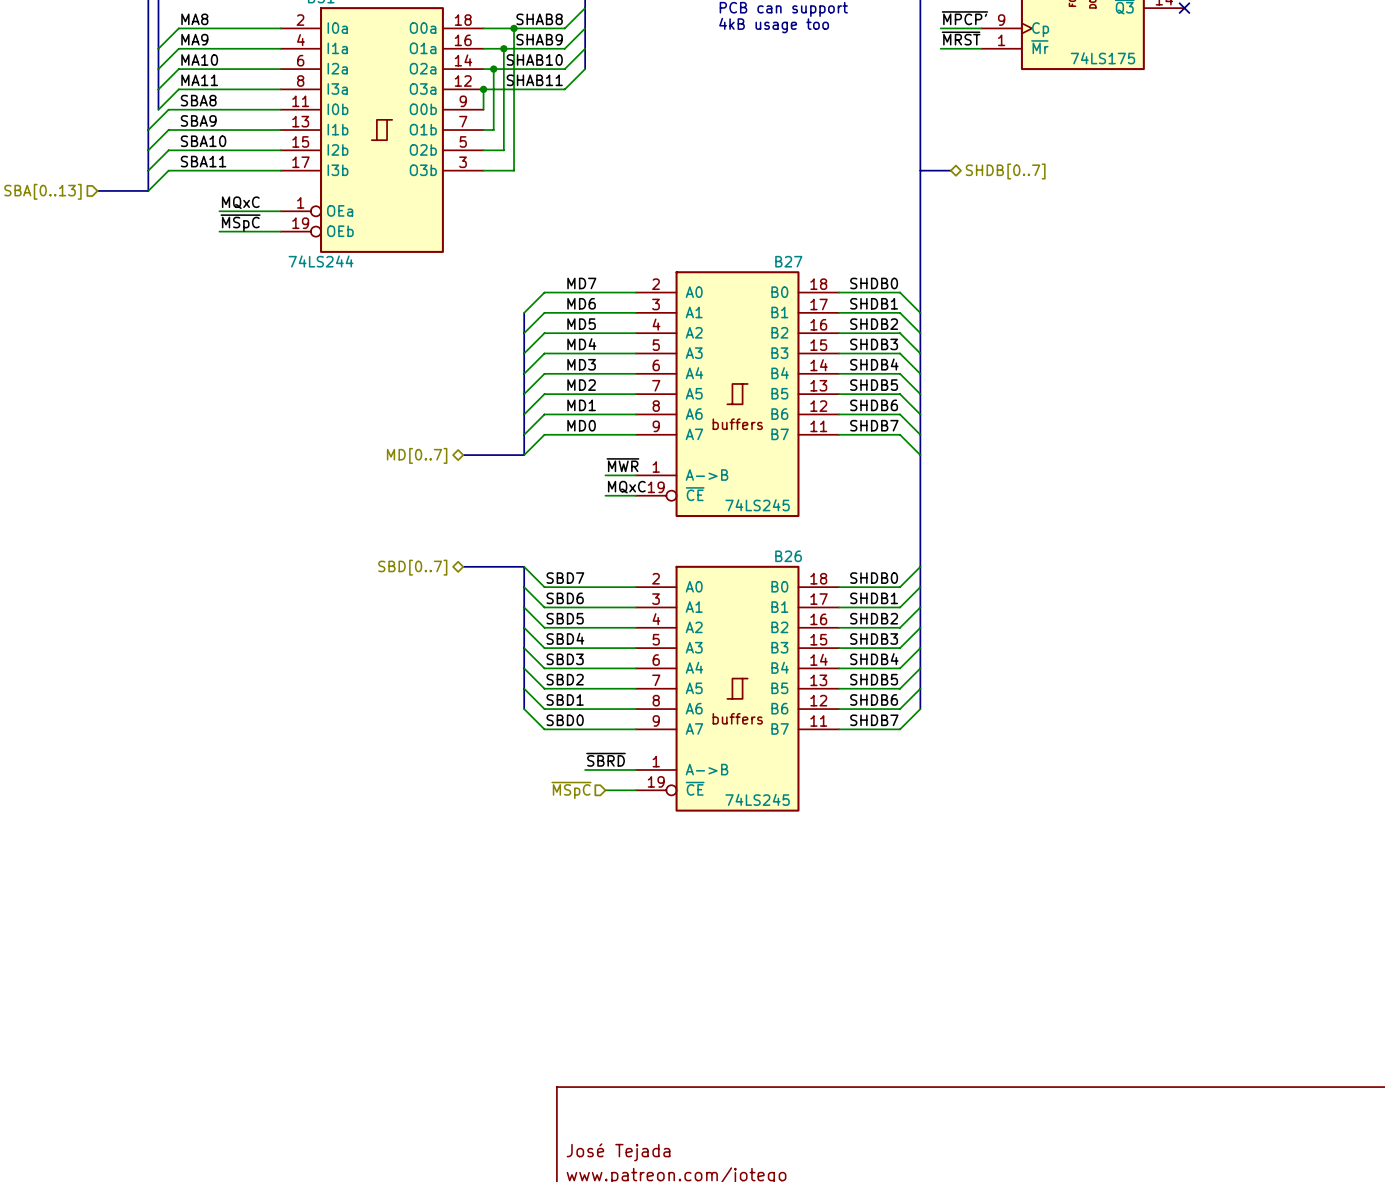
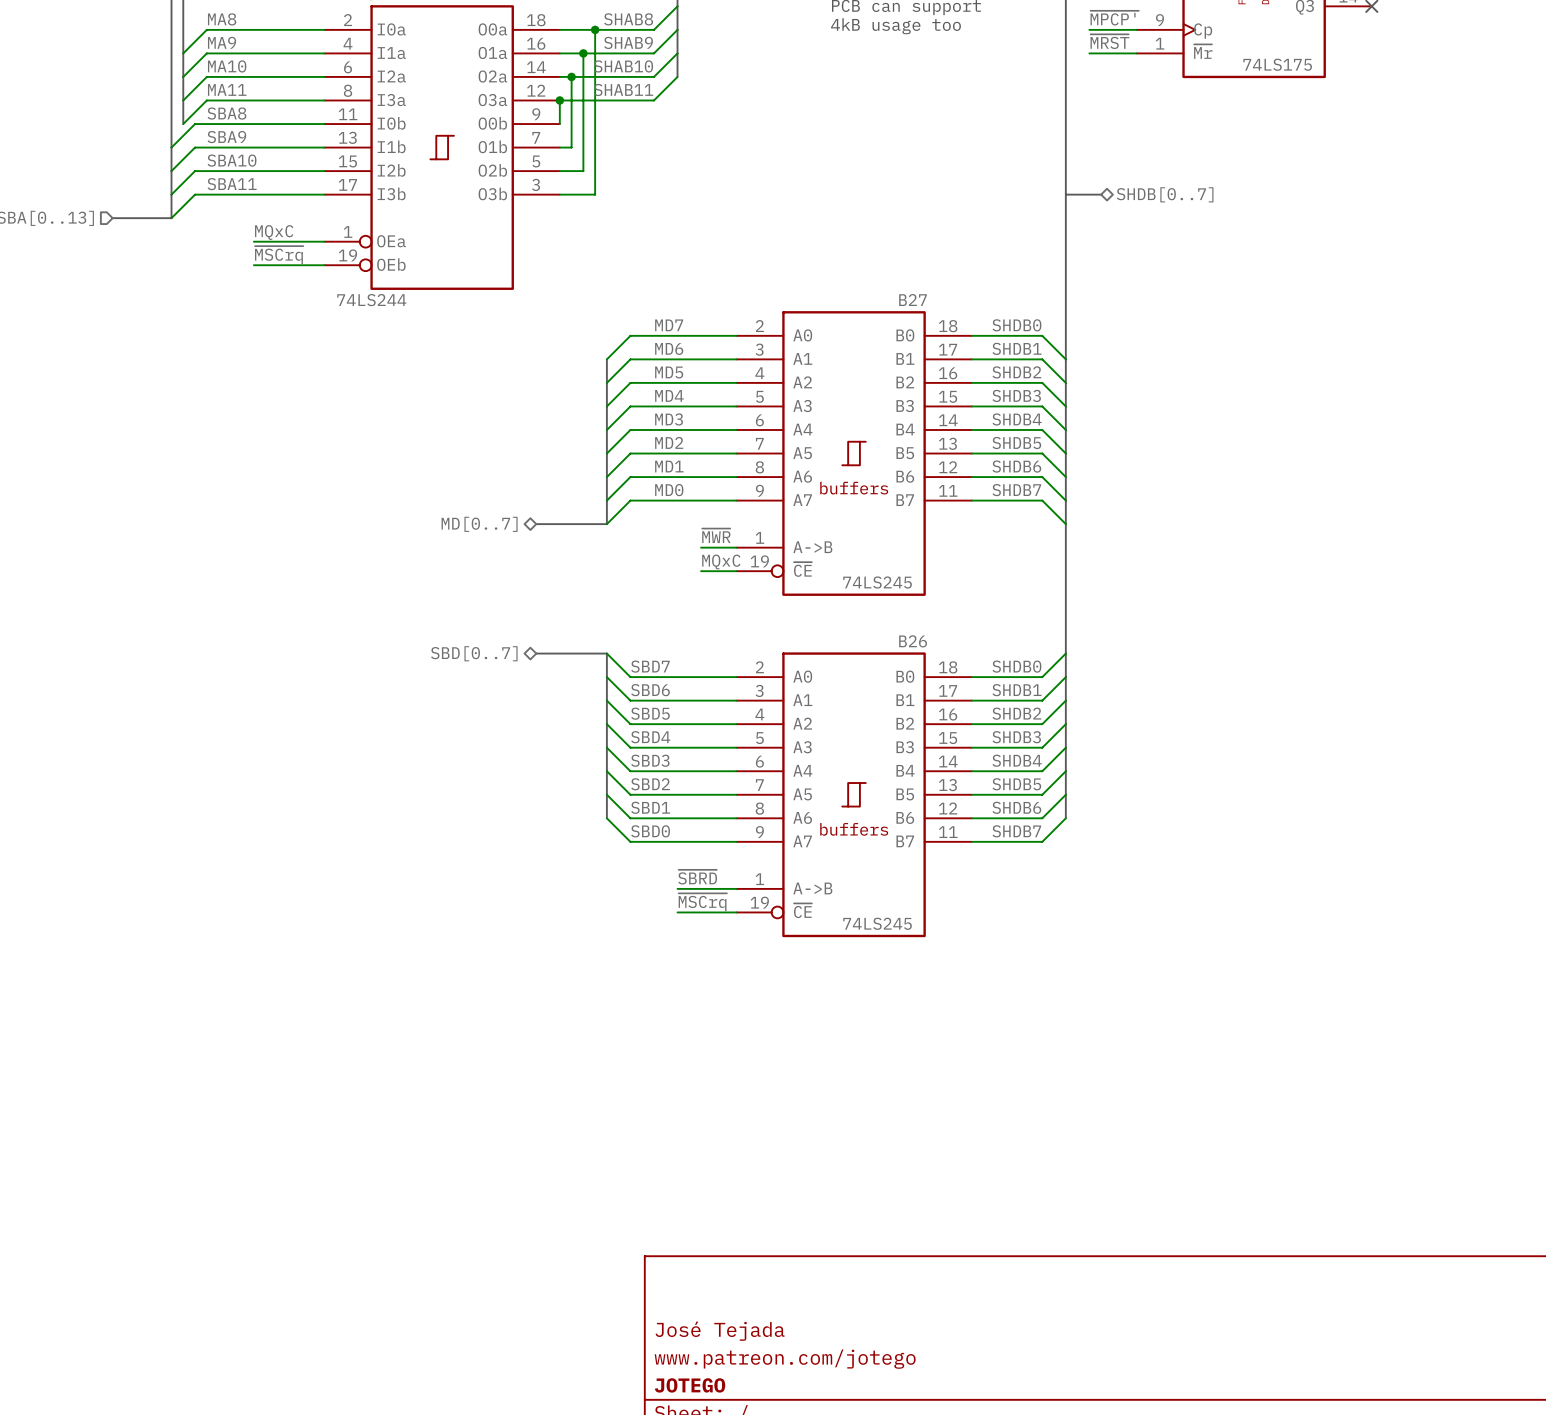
label: ~{MSpC} (240, 223) -> ~{MSCrq} (279, 255)
label: none -> ~{MSCrq} (702, 902)
hierarchical label: ~{MSpC} (571, 790) -> none
wire: none -> (677, 912) (701, 912)

